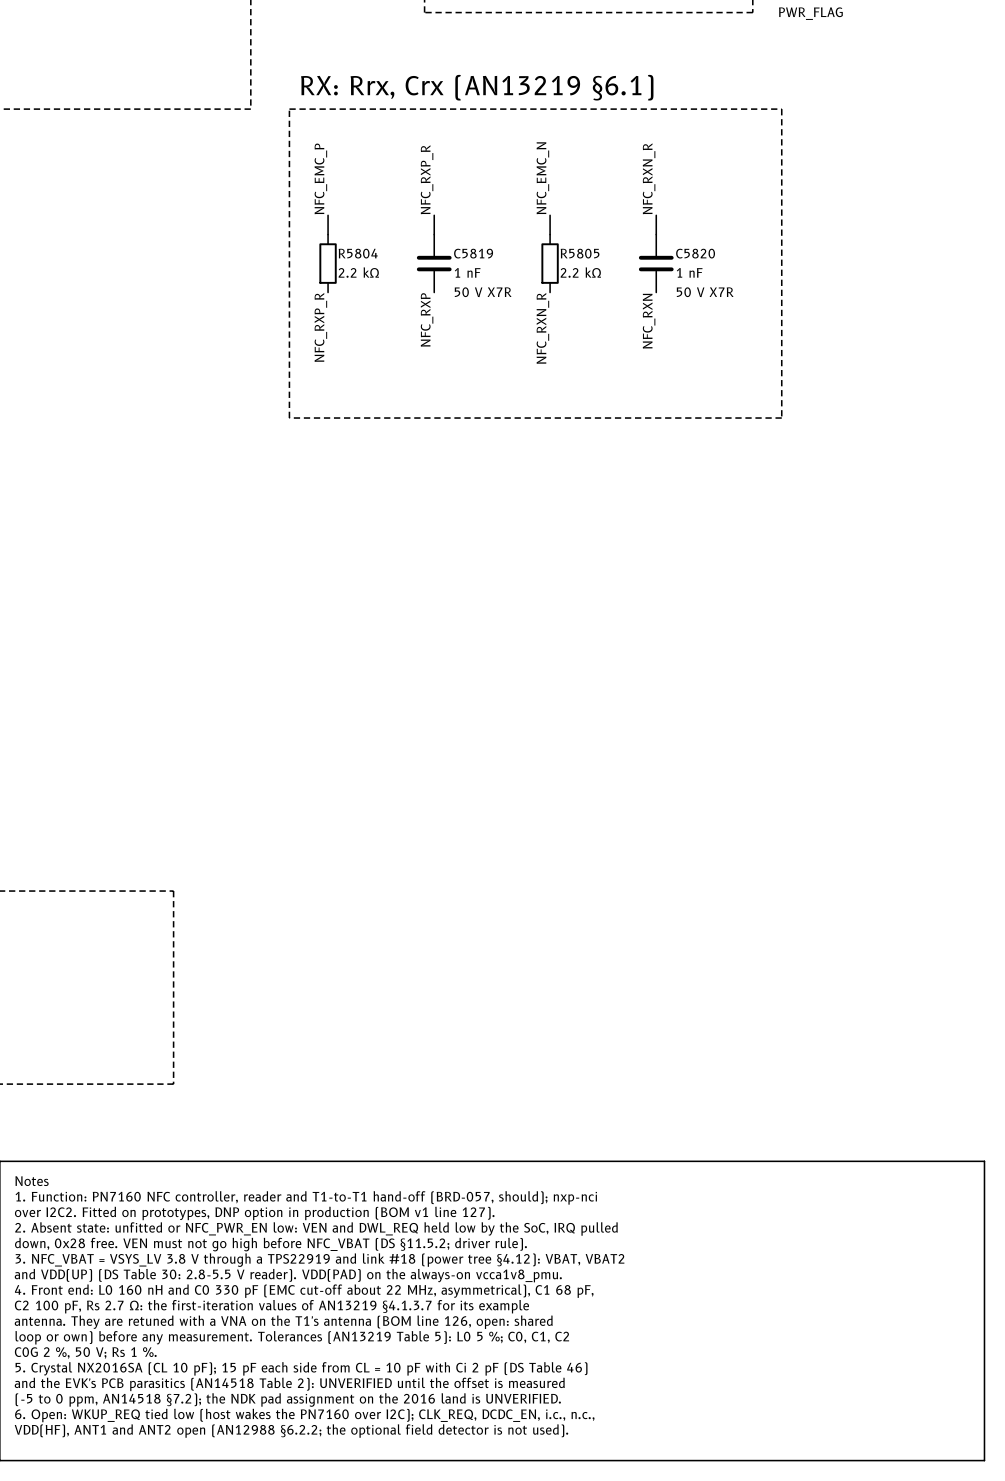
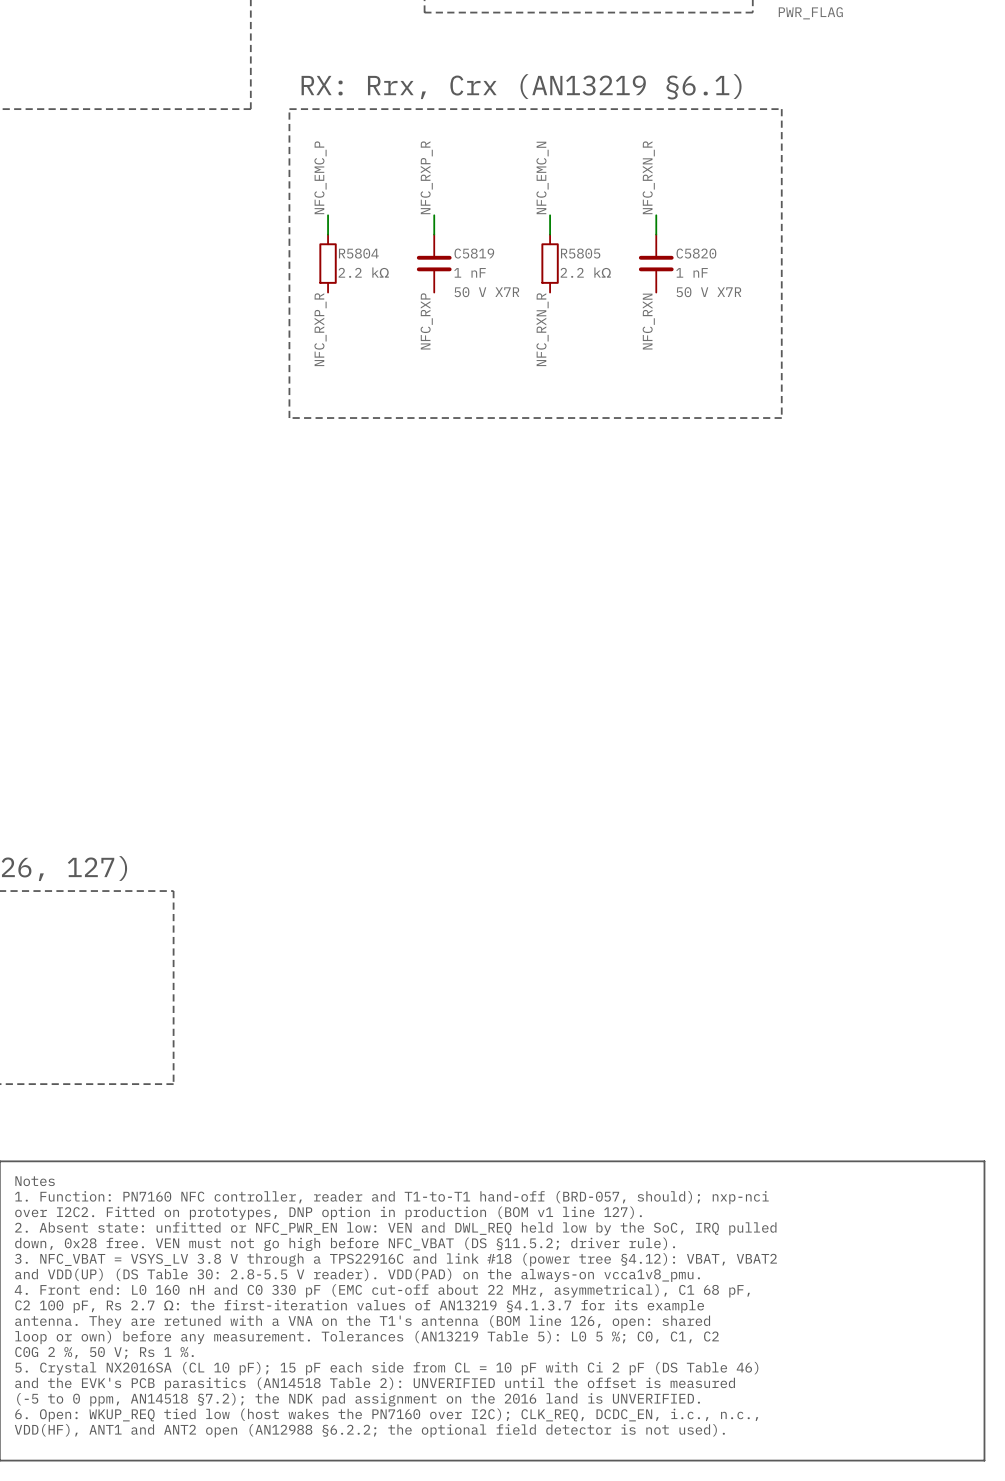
text: 3. NFC_VBAT = VSYS_LV 3.8 V through a TPS22919 and link #18 (power tree §4.12): VBAT, VBAT2 (319, 1260) -> 3. NFC_VBAT = VSYS_LV 3.8 V through a TPS22916C and link #18 (power tree §4.12): VBAT, VBAT2 (395, 1259)

